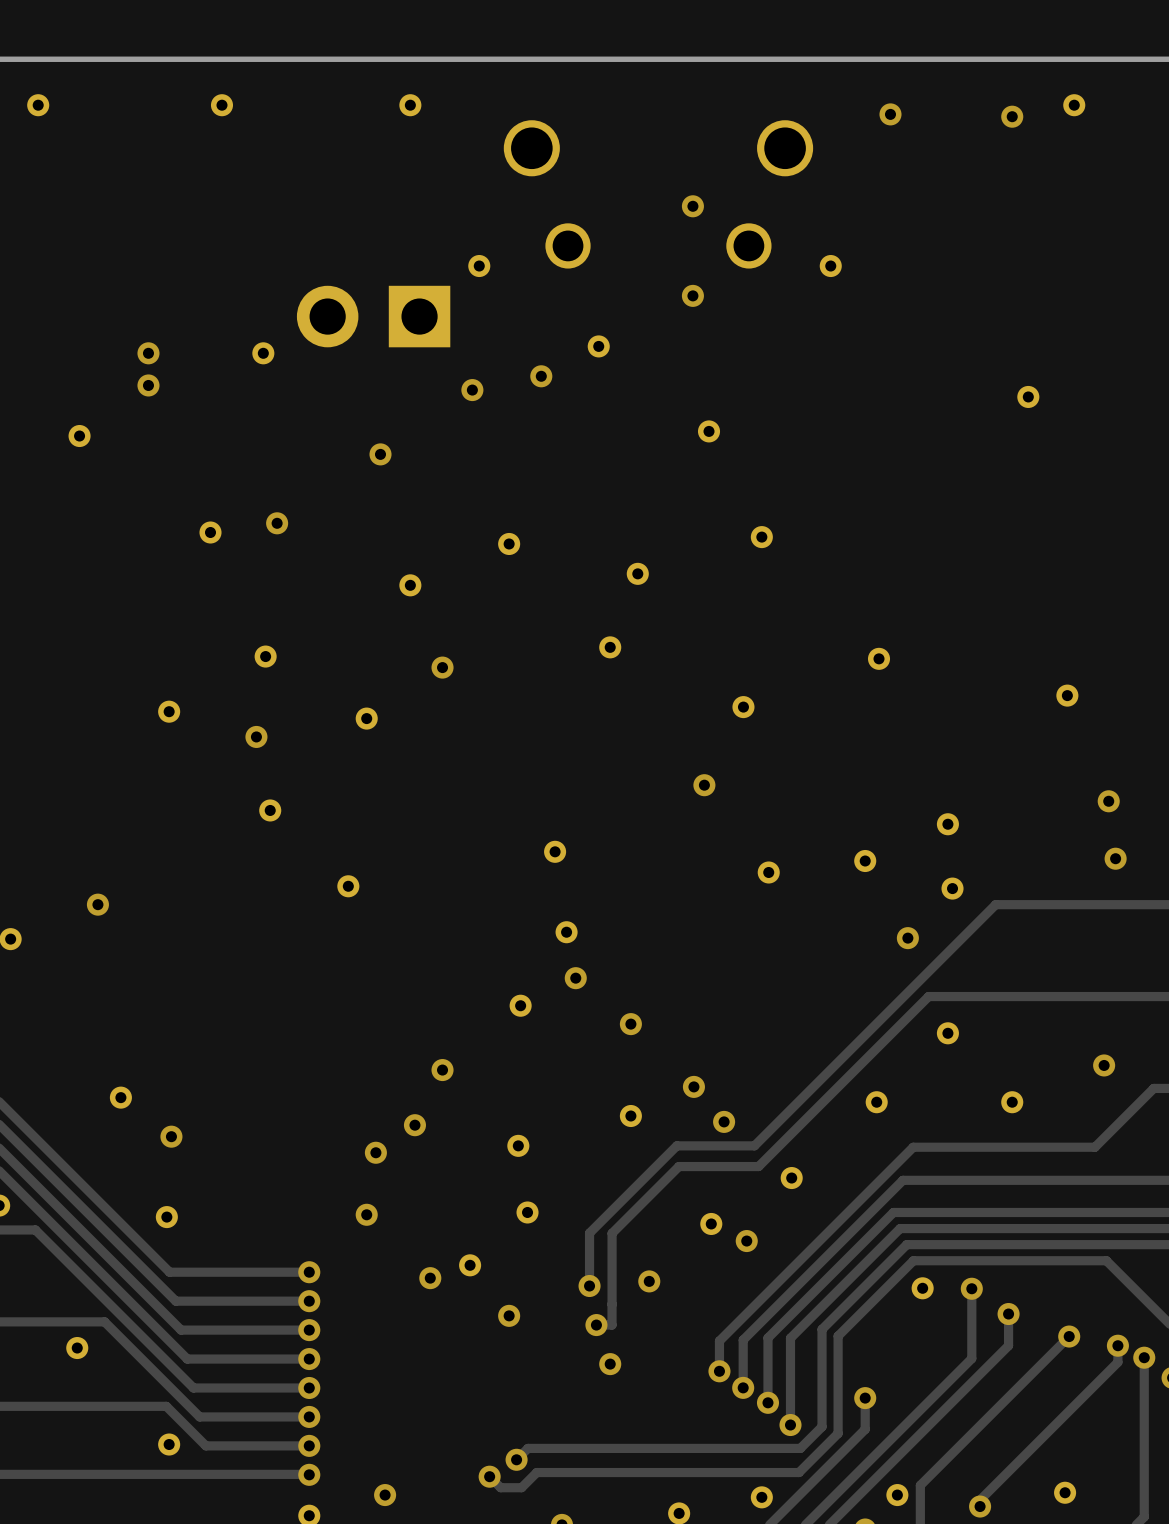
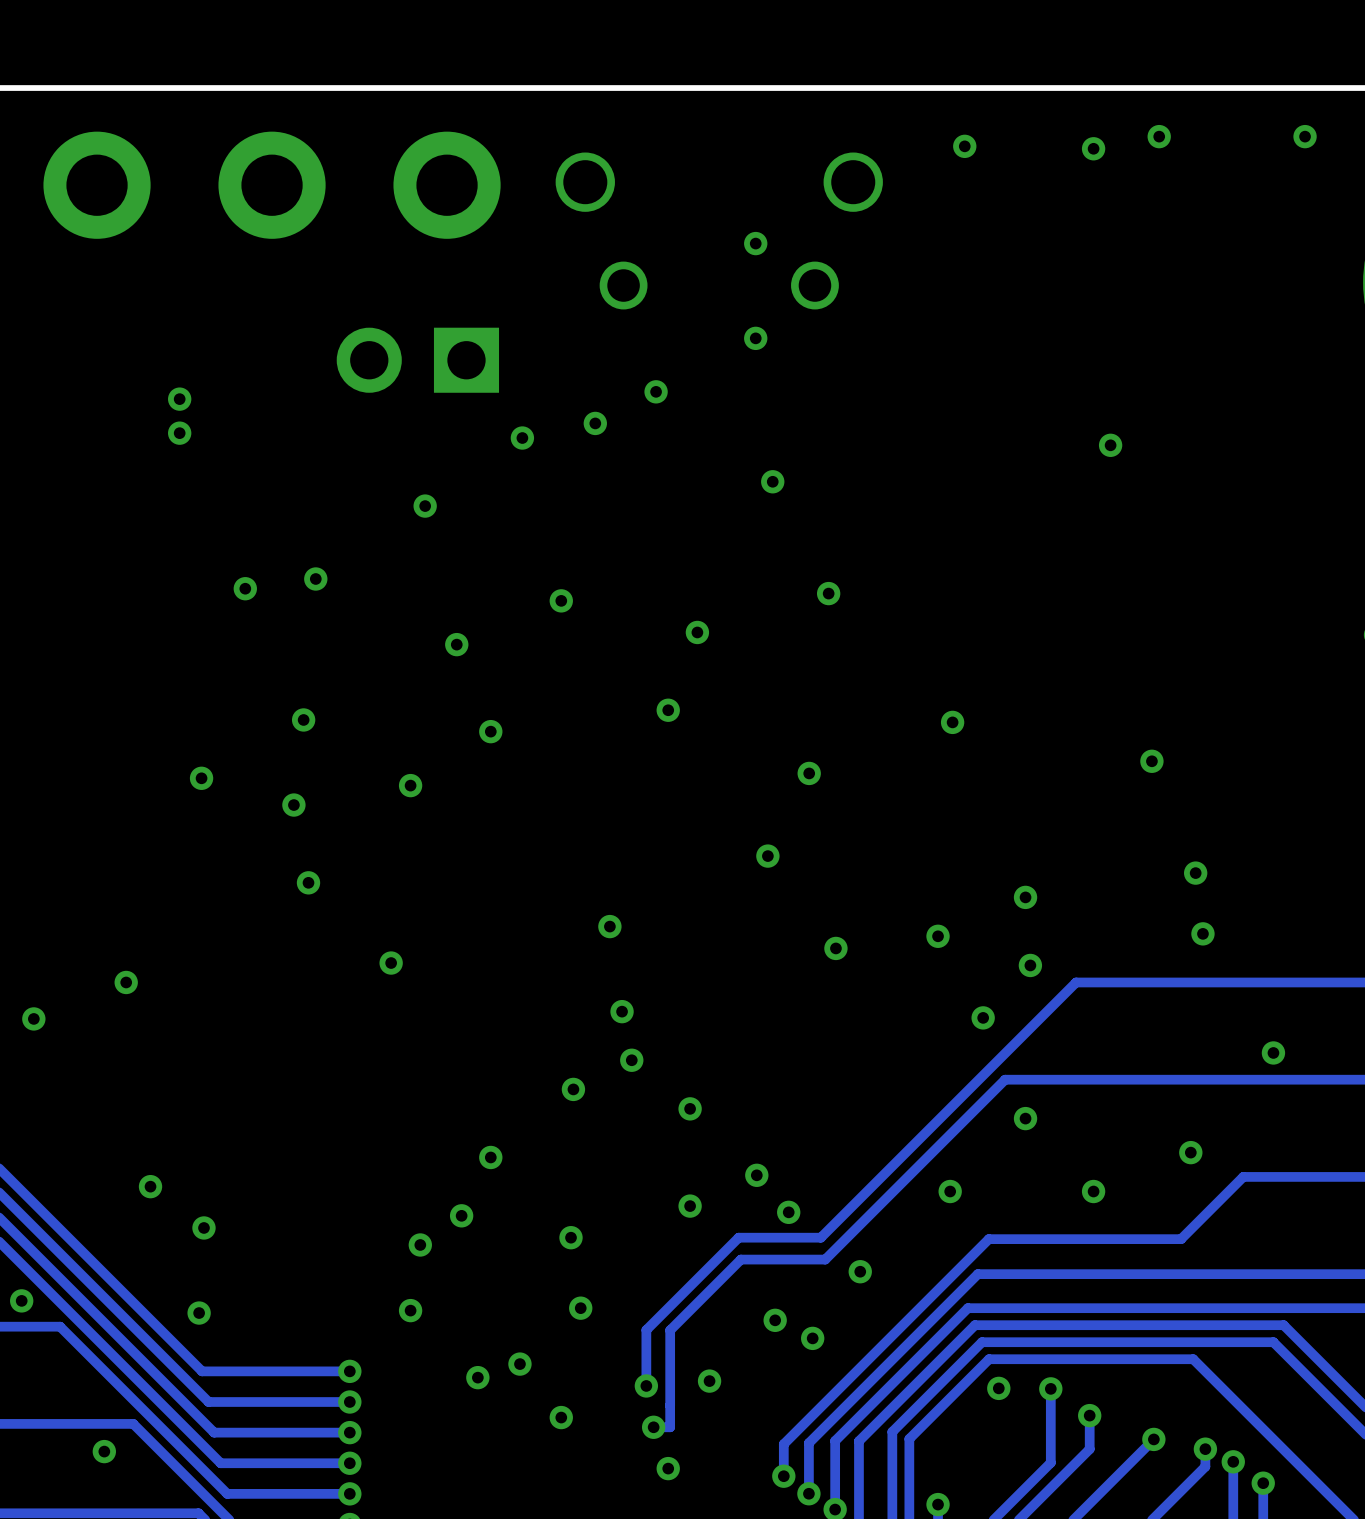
part: (38, 105) -> none
part: (221, 105) -> none
part: (410, 105) -> none
part: none -> (97, 185)
part: none -> (272, 185)
part: none -> (447, 185)
part: (479, 266) -> none
part: (830, 266) -> none
part: (263, 353) -> none
part: (79, 436) -> none

